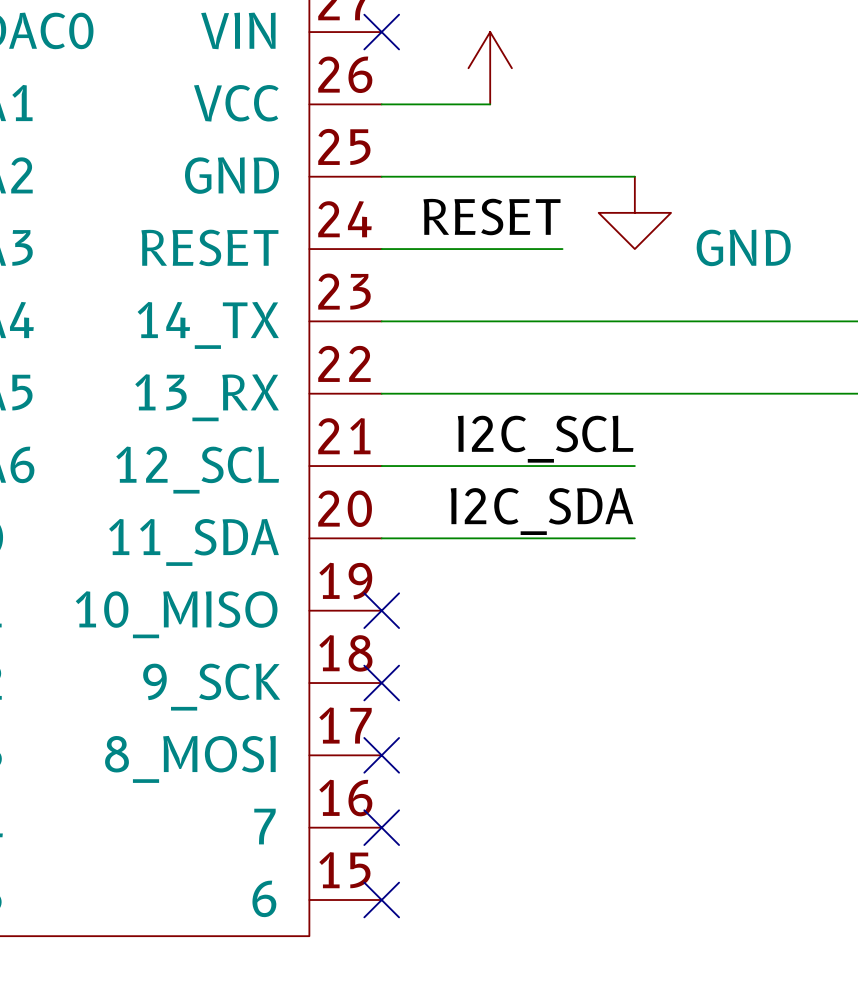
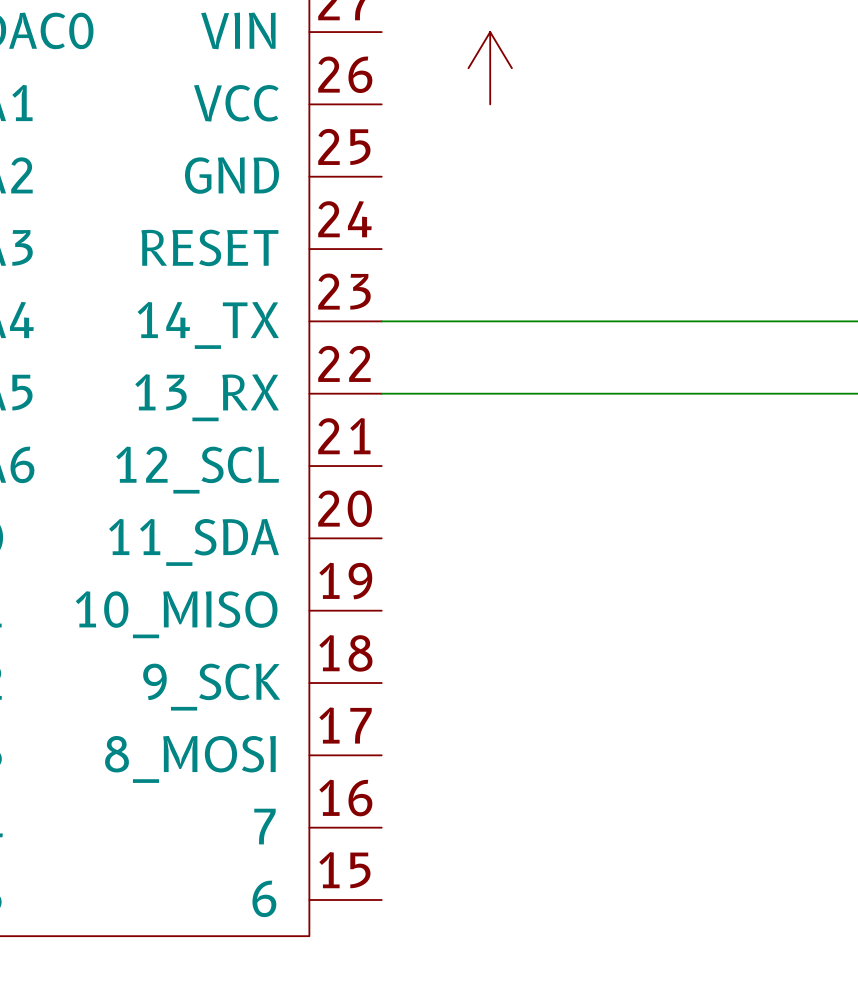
no-connect mark: (381, 32) -> none
wire: (381, 104) (490, 104) -> none
wire: (381, 176) (634, 176) -> none
power symbol: GND (634, 212) -> none
label: RESET (491, 217) -> none
wire: (381, 249) (562, 249) -> none
label: I2C_SCL (545, 439) -> none
wire: (381, 466) (634, 466) -> none
label: I2C_SDA (542, 511) -> none
wire: (381, 538) (634, 538) -> none
no-connect mark: (381, 610) -> none
no-connect mark: (381, 683) -> none
no-connect mark: (381, 755) -> none
no-connect mark: (381, 827) -> none
no-connect mark: (381, 900) -> none

